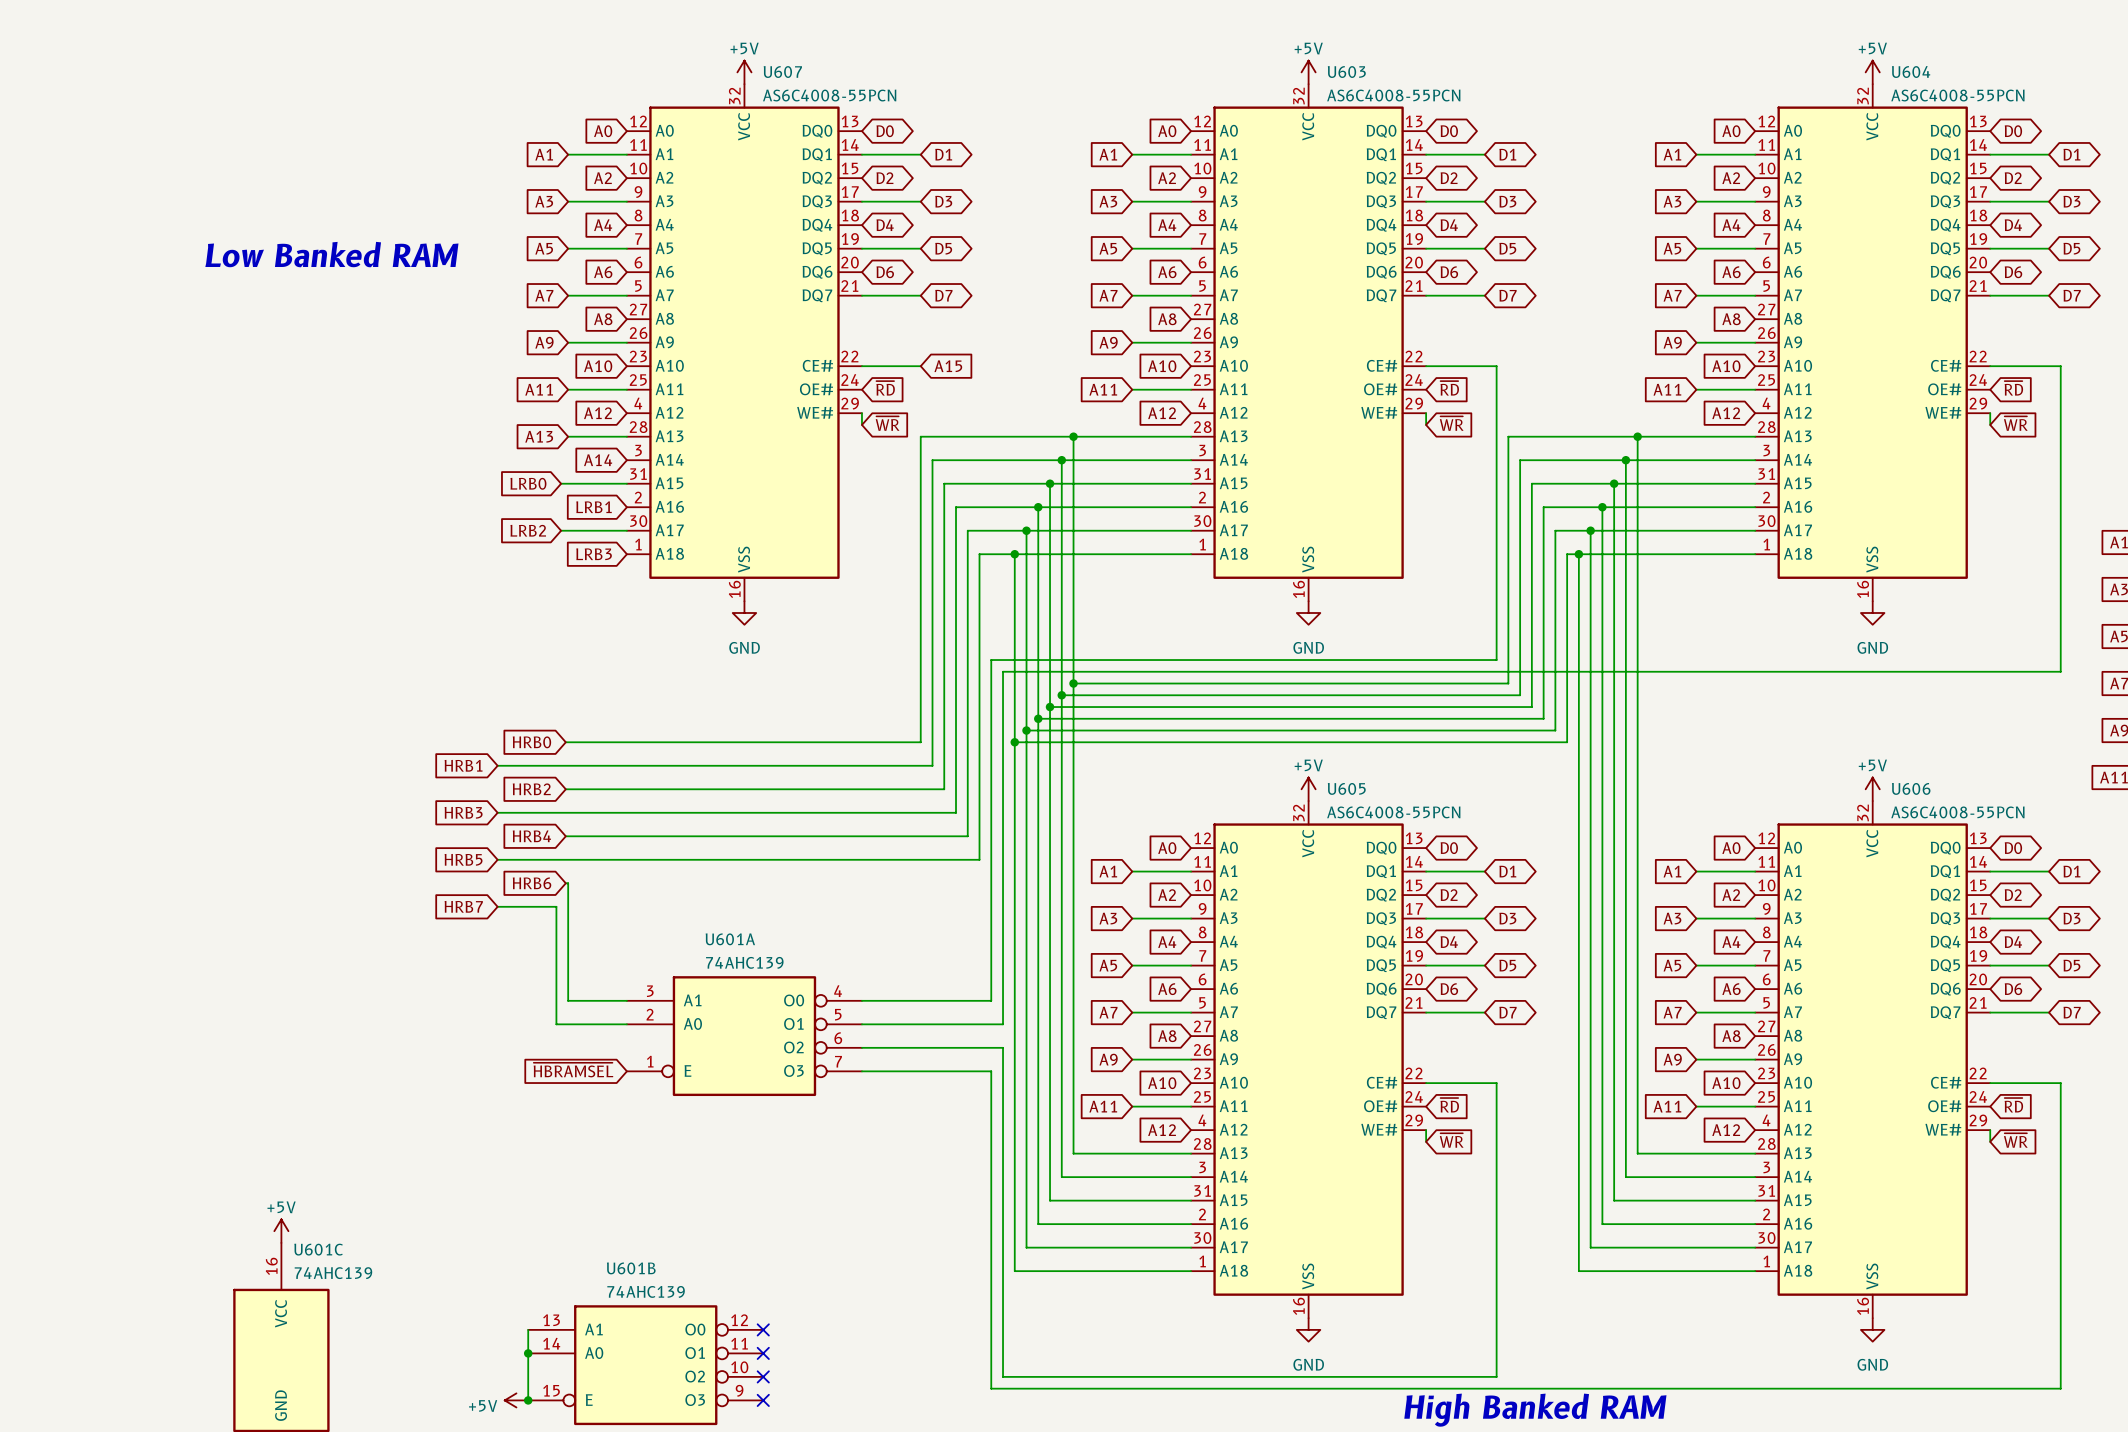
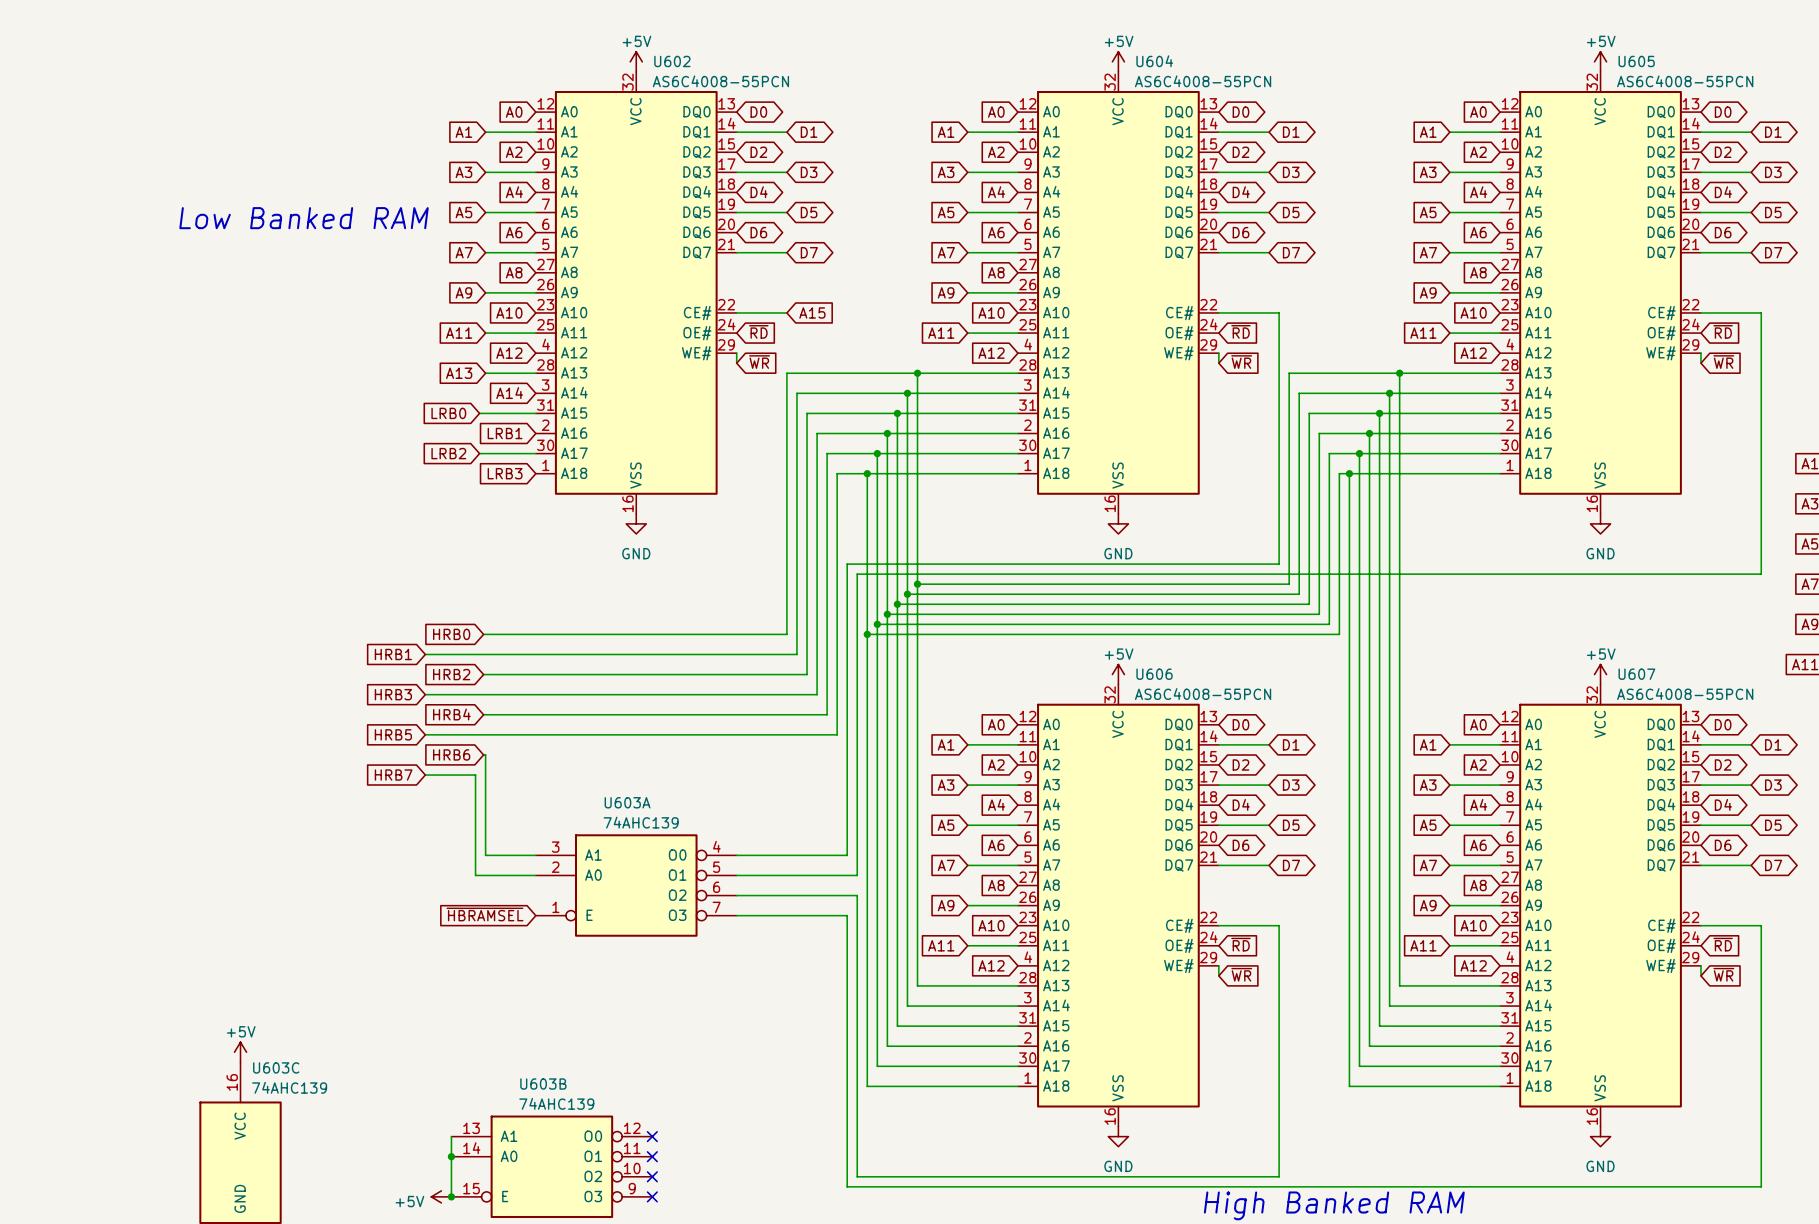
U607 name: U607 (782, 72) -> U602 (672, 61)
U603 name: U603 (1346, 72) -> U604 (1154, 61)
U604 name: U604 (1911, 72) -> U605 (1636, 61)
U605 name: U605 (1346, 788) -> U606 (1154, 674)
U606 name: U606 (1911, 788) -> U607 (1636, 674)
U601A name: U601A (730, 939) -> U603A (627, 802)
U601C name: U601C (318, 1249) -> U603C (276, 1067)
U601B name: U601B (631, 1268) -> U603B (543, 1084)

